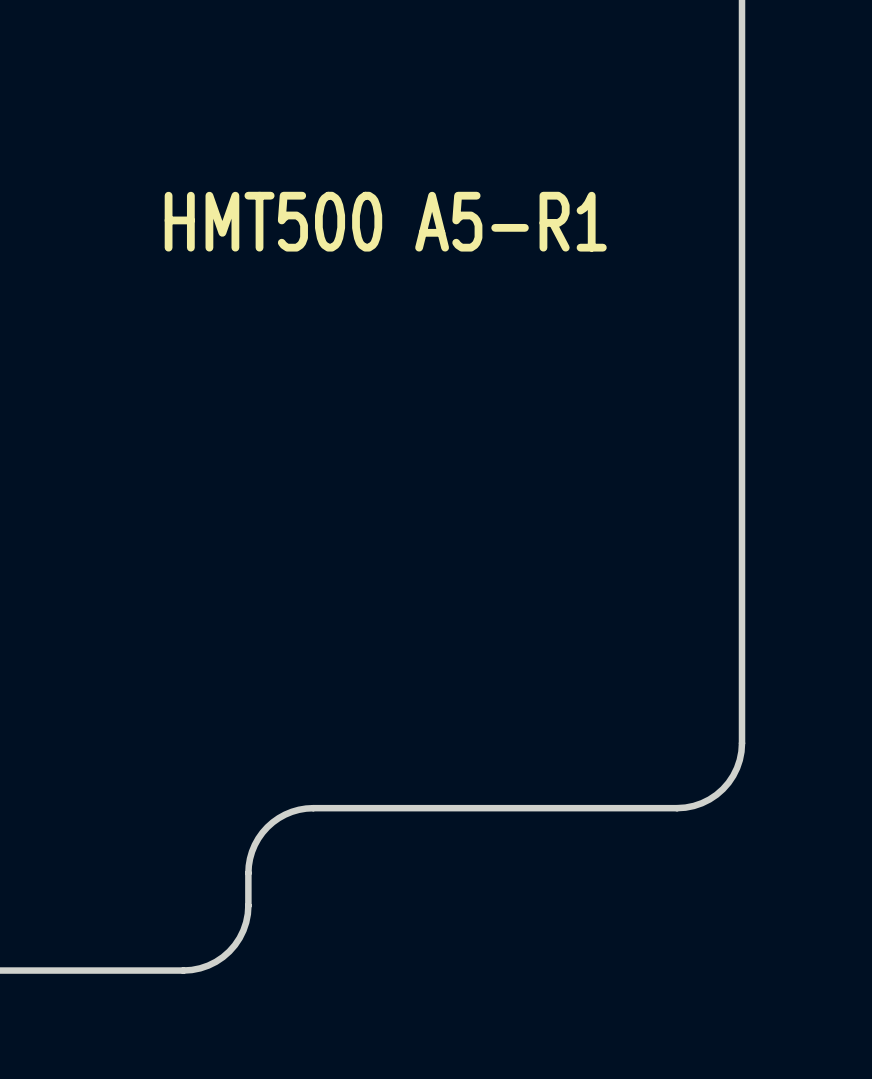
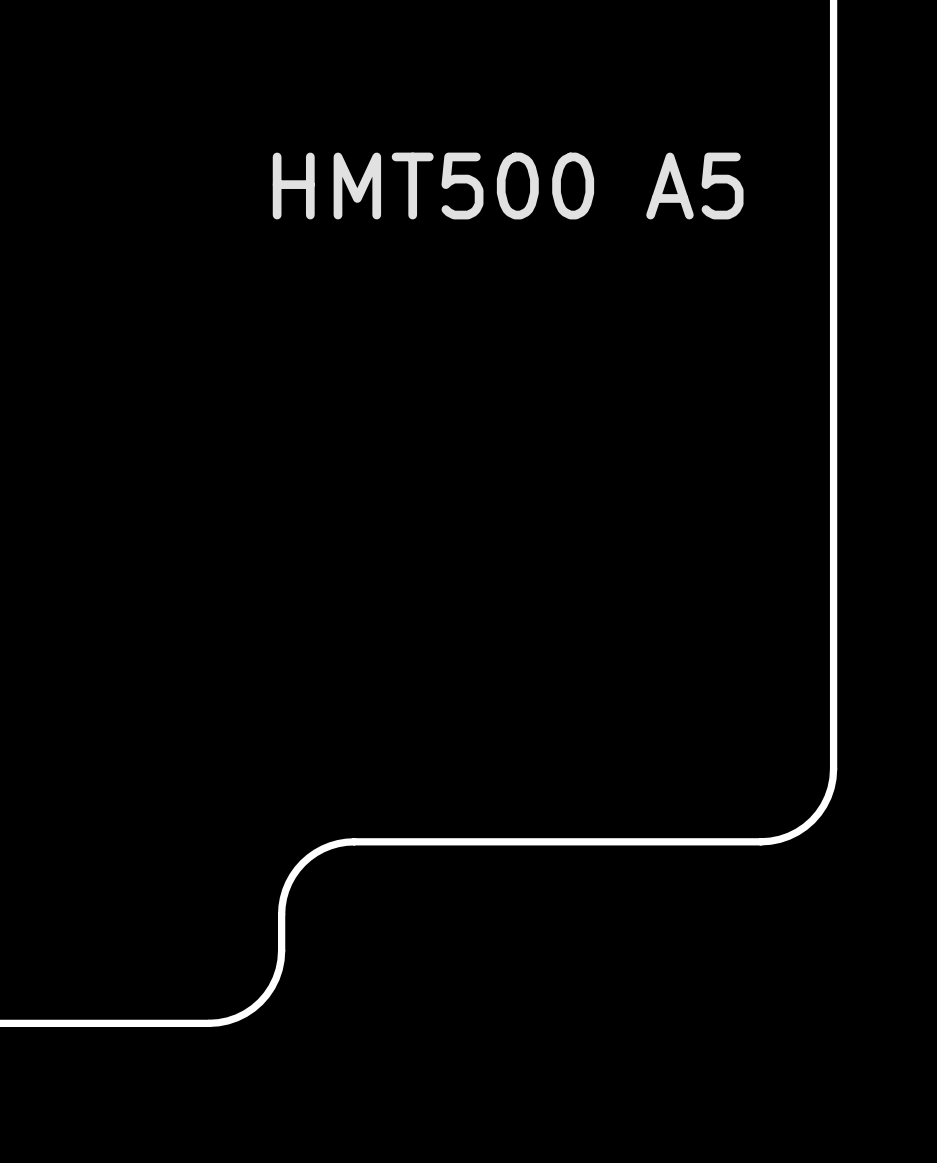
text: HMT500 A5-R1 (385, 221) -> HMT500 A5 (508, 186)

